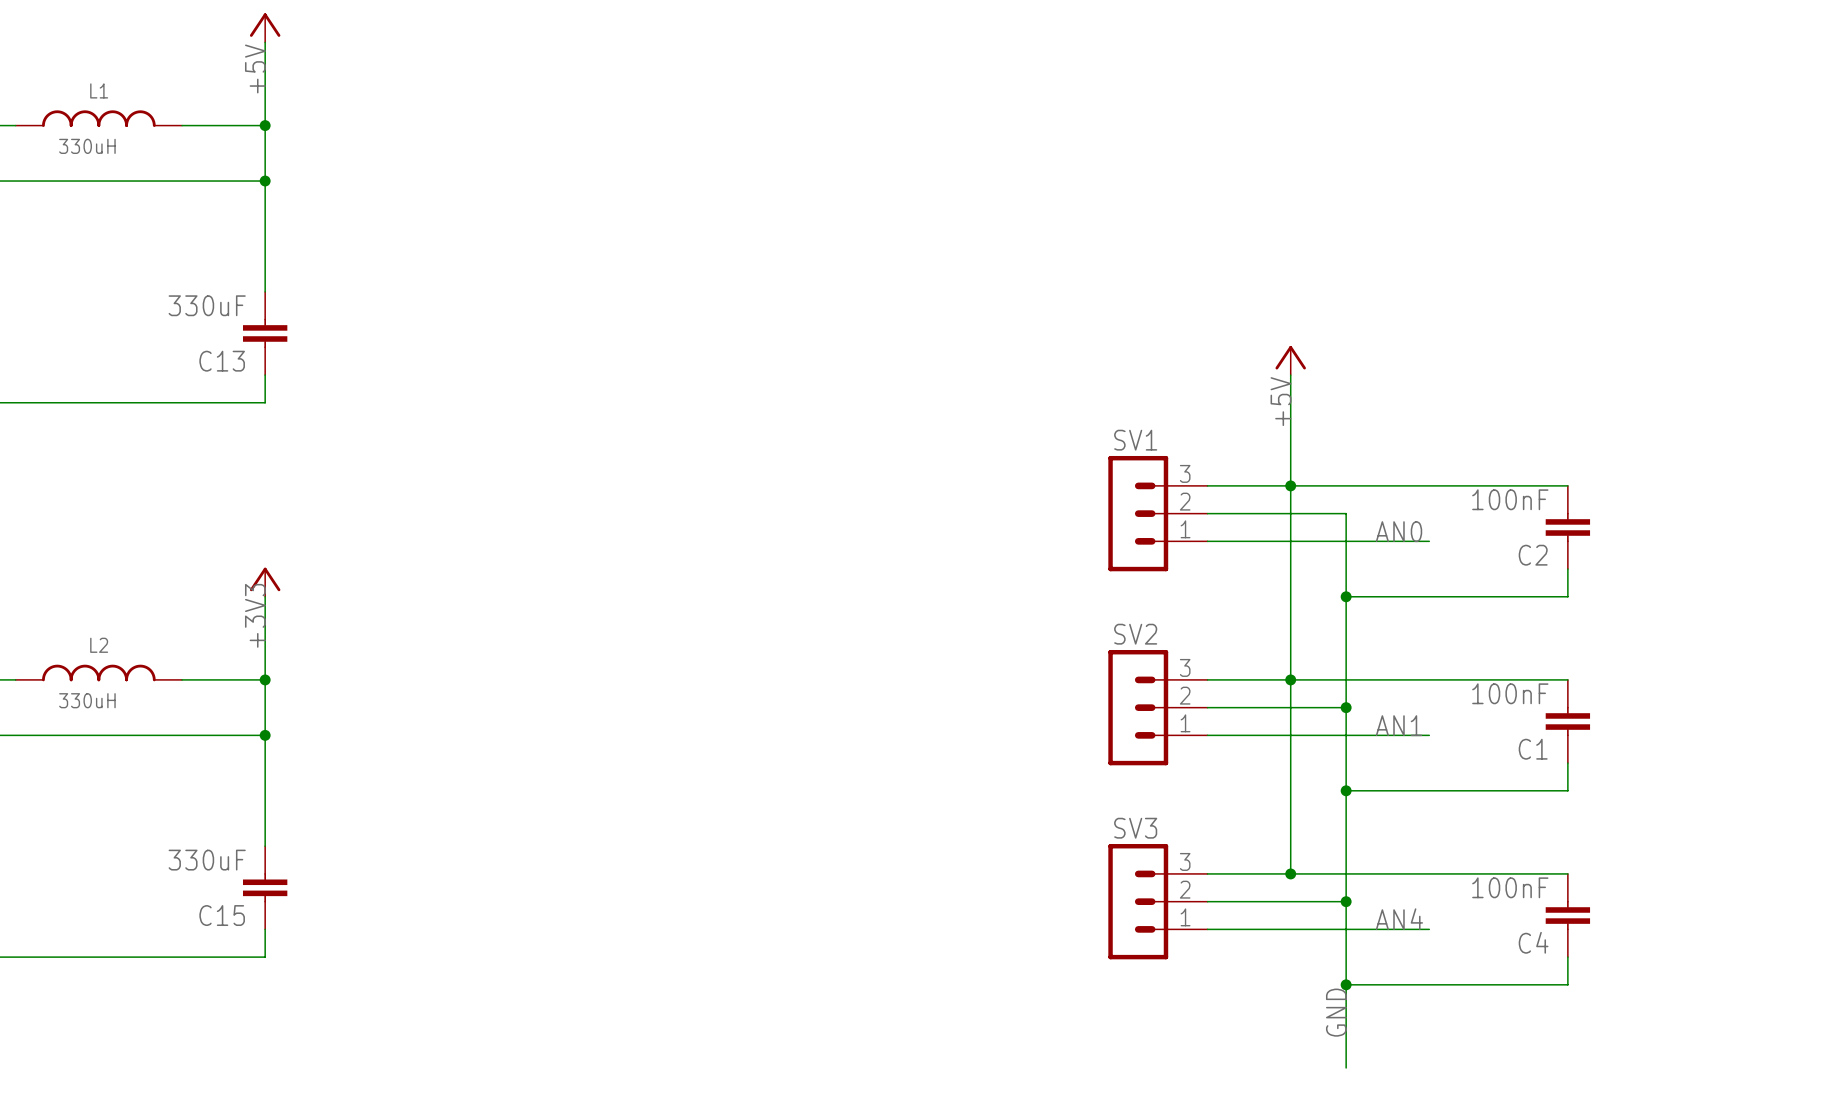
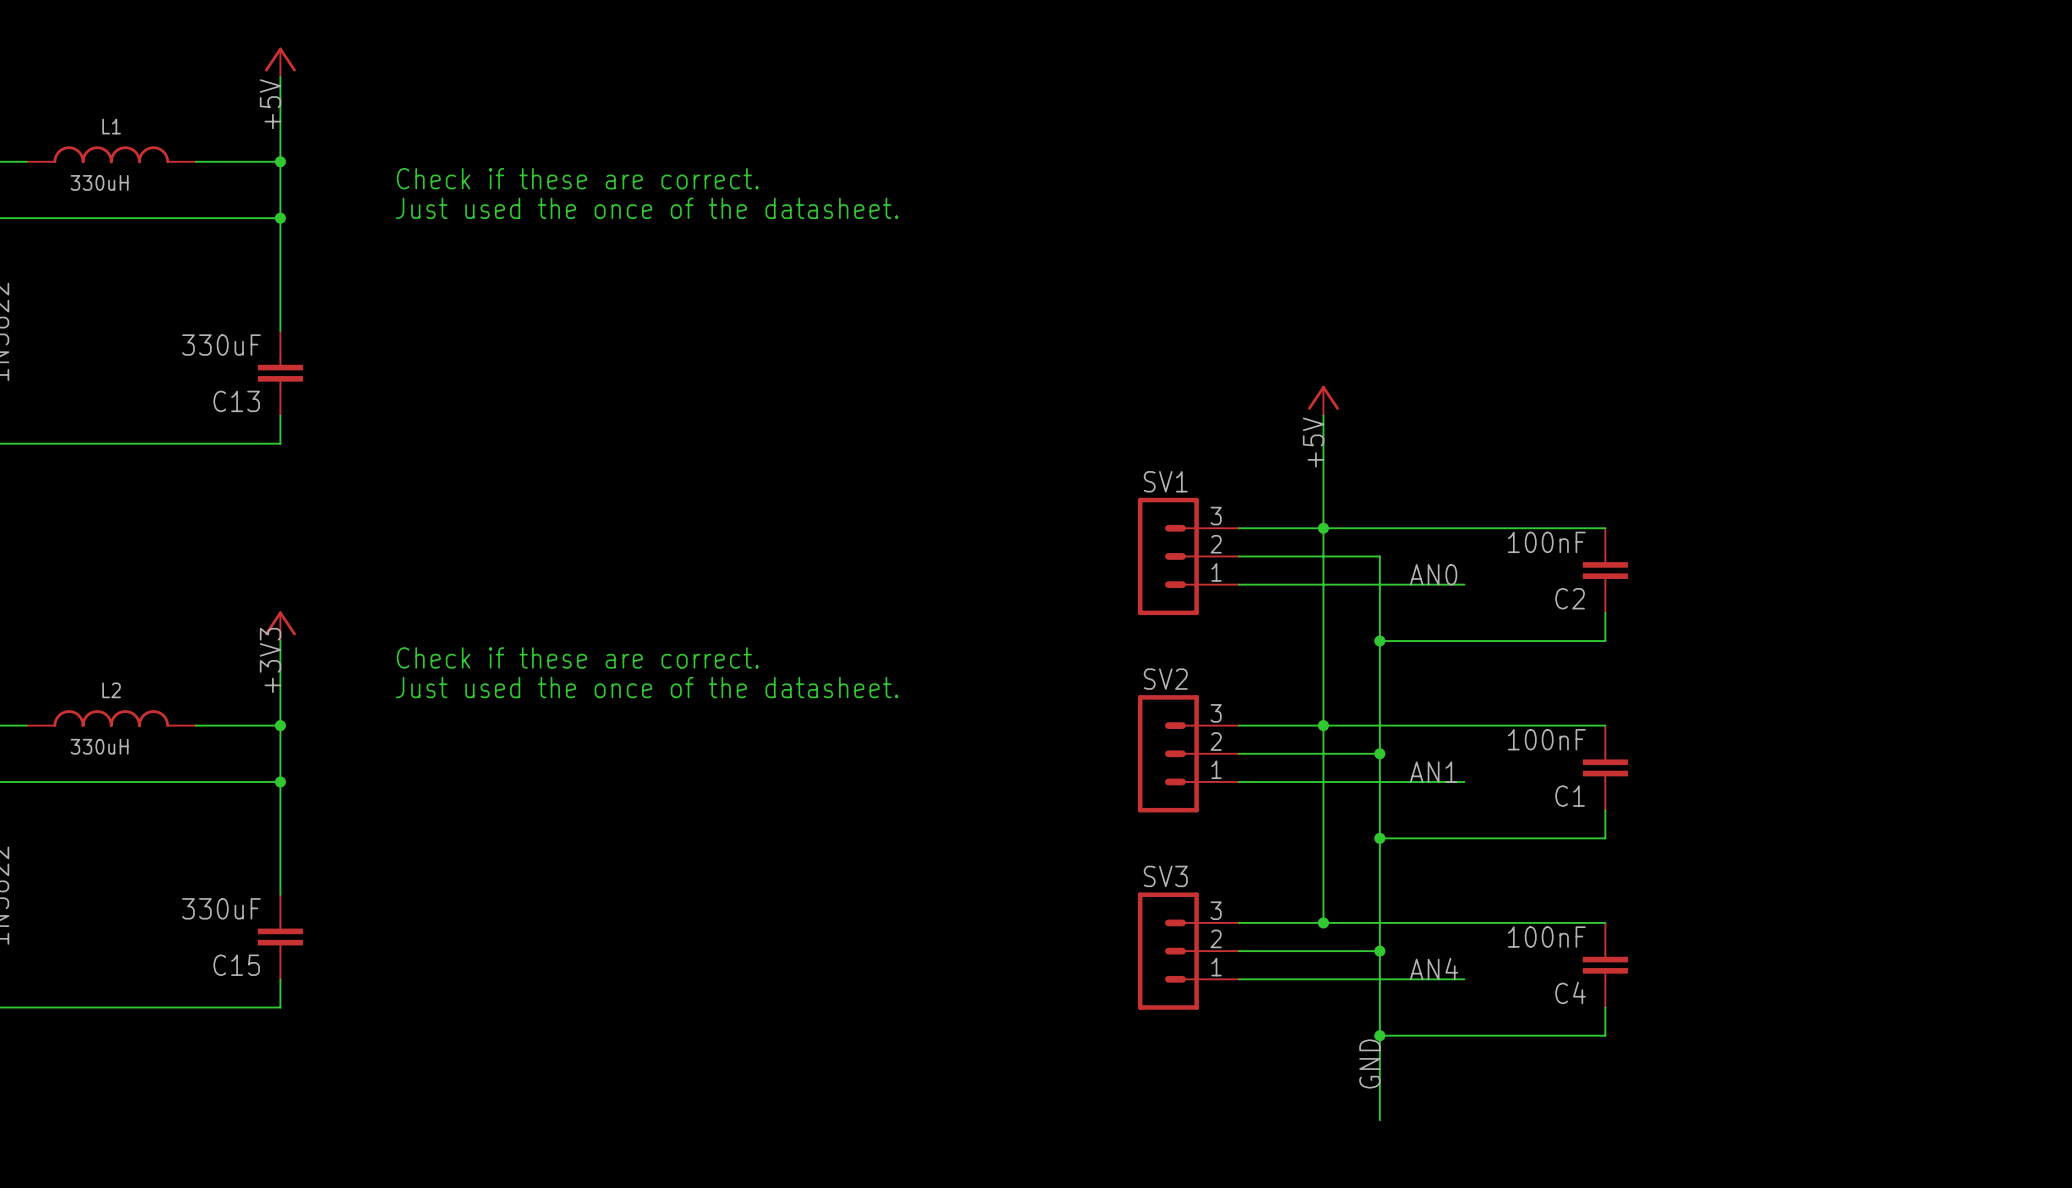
text: none -> Check if these are correct. (577, 178)
text: none -> Just used the once of the datasheet. (647, 208)
text: none -> Check if these are correct. (577, 657)
text: none -> Just used the once of the datasheet. (647, 687)

